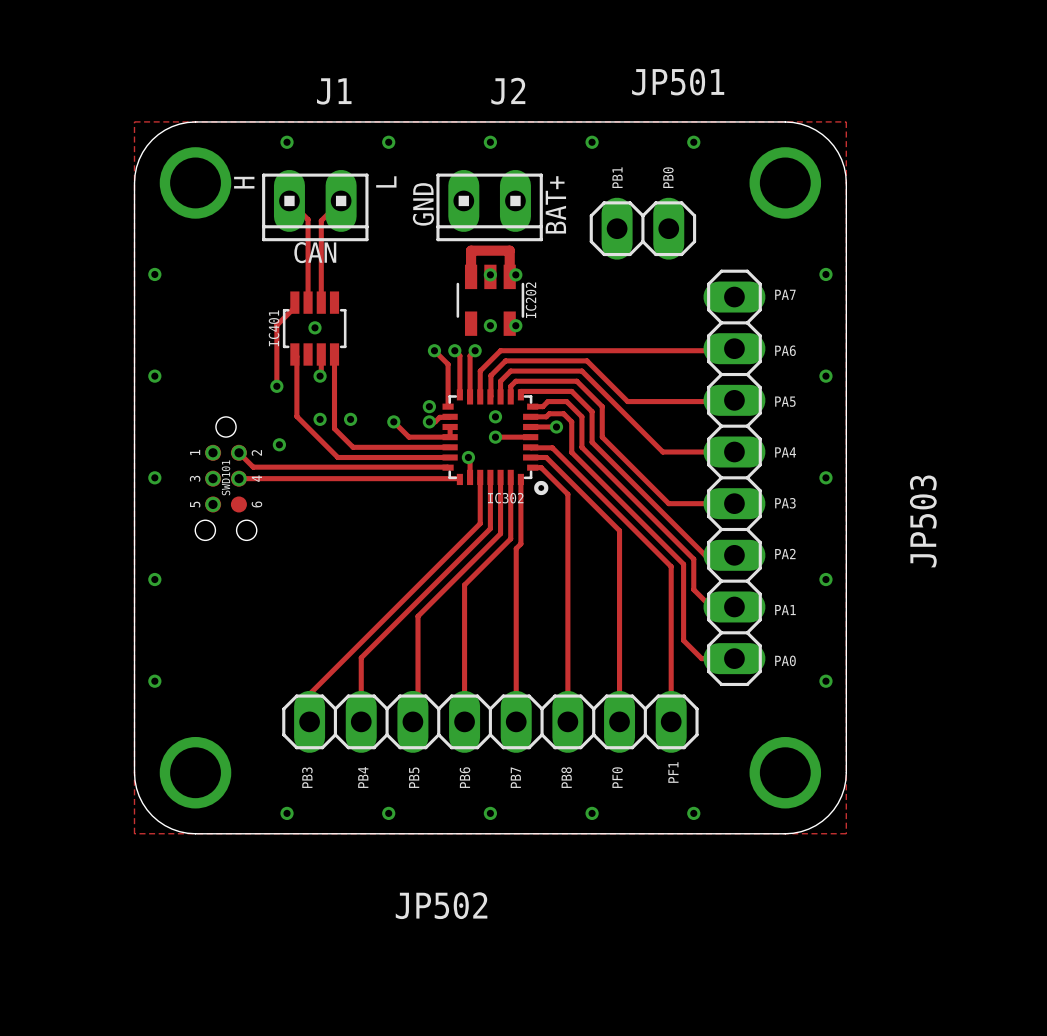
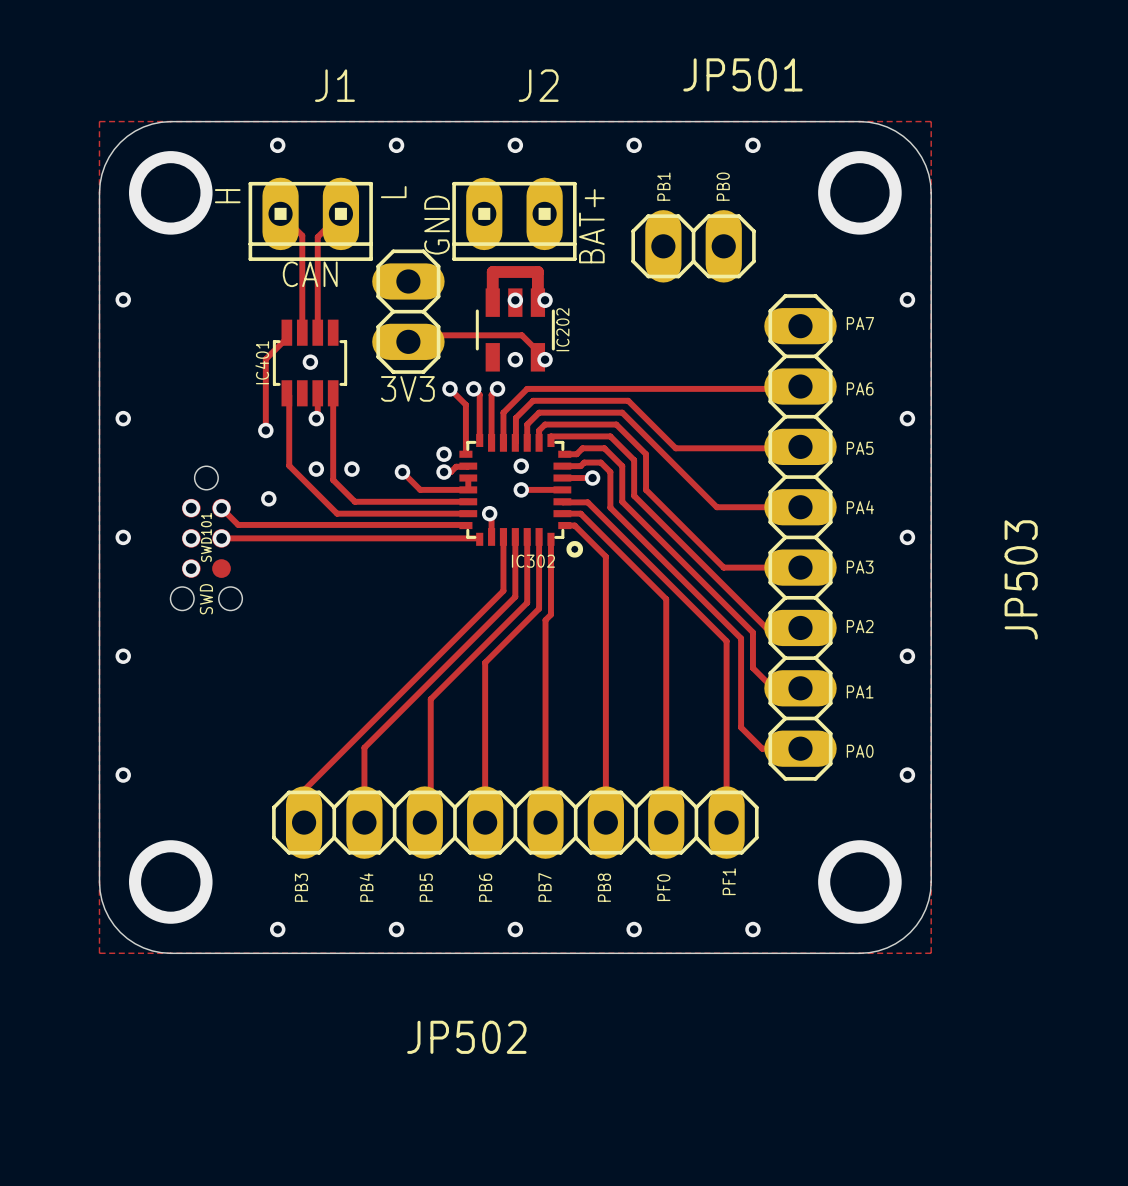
3V3: none -> (408, 311)
track: none -> (408, 341) (414, 335) (521, 335) (537, 351) (537, 357)
SWD101 text: 1 (195, 452) -> none
SWD101 text: 2 (256, 452) -> none
SWD101 text: 3 (195, 478) -> none
SWD101 text: 4 (256, 478) -> none
SWD101 text: 5 (195, 504) -> none
SWD101 text: 6 (256, 504) -> none
SWD101 text: none -> SWD (206, 599)

